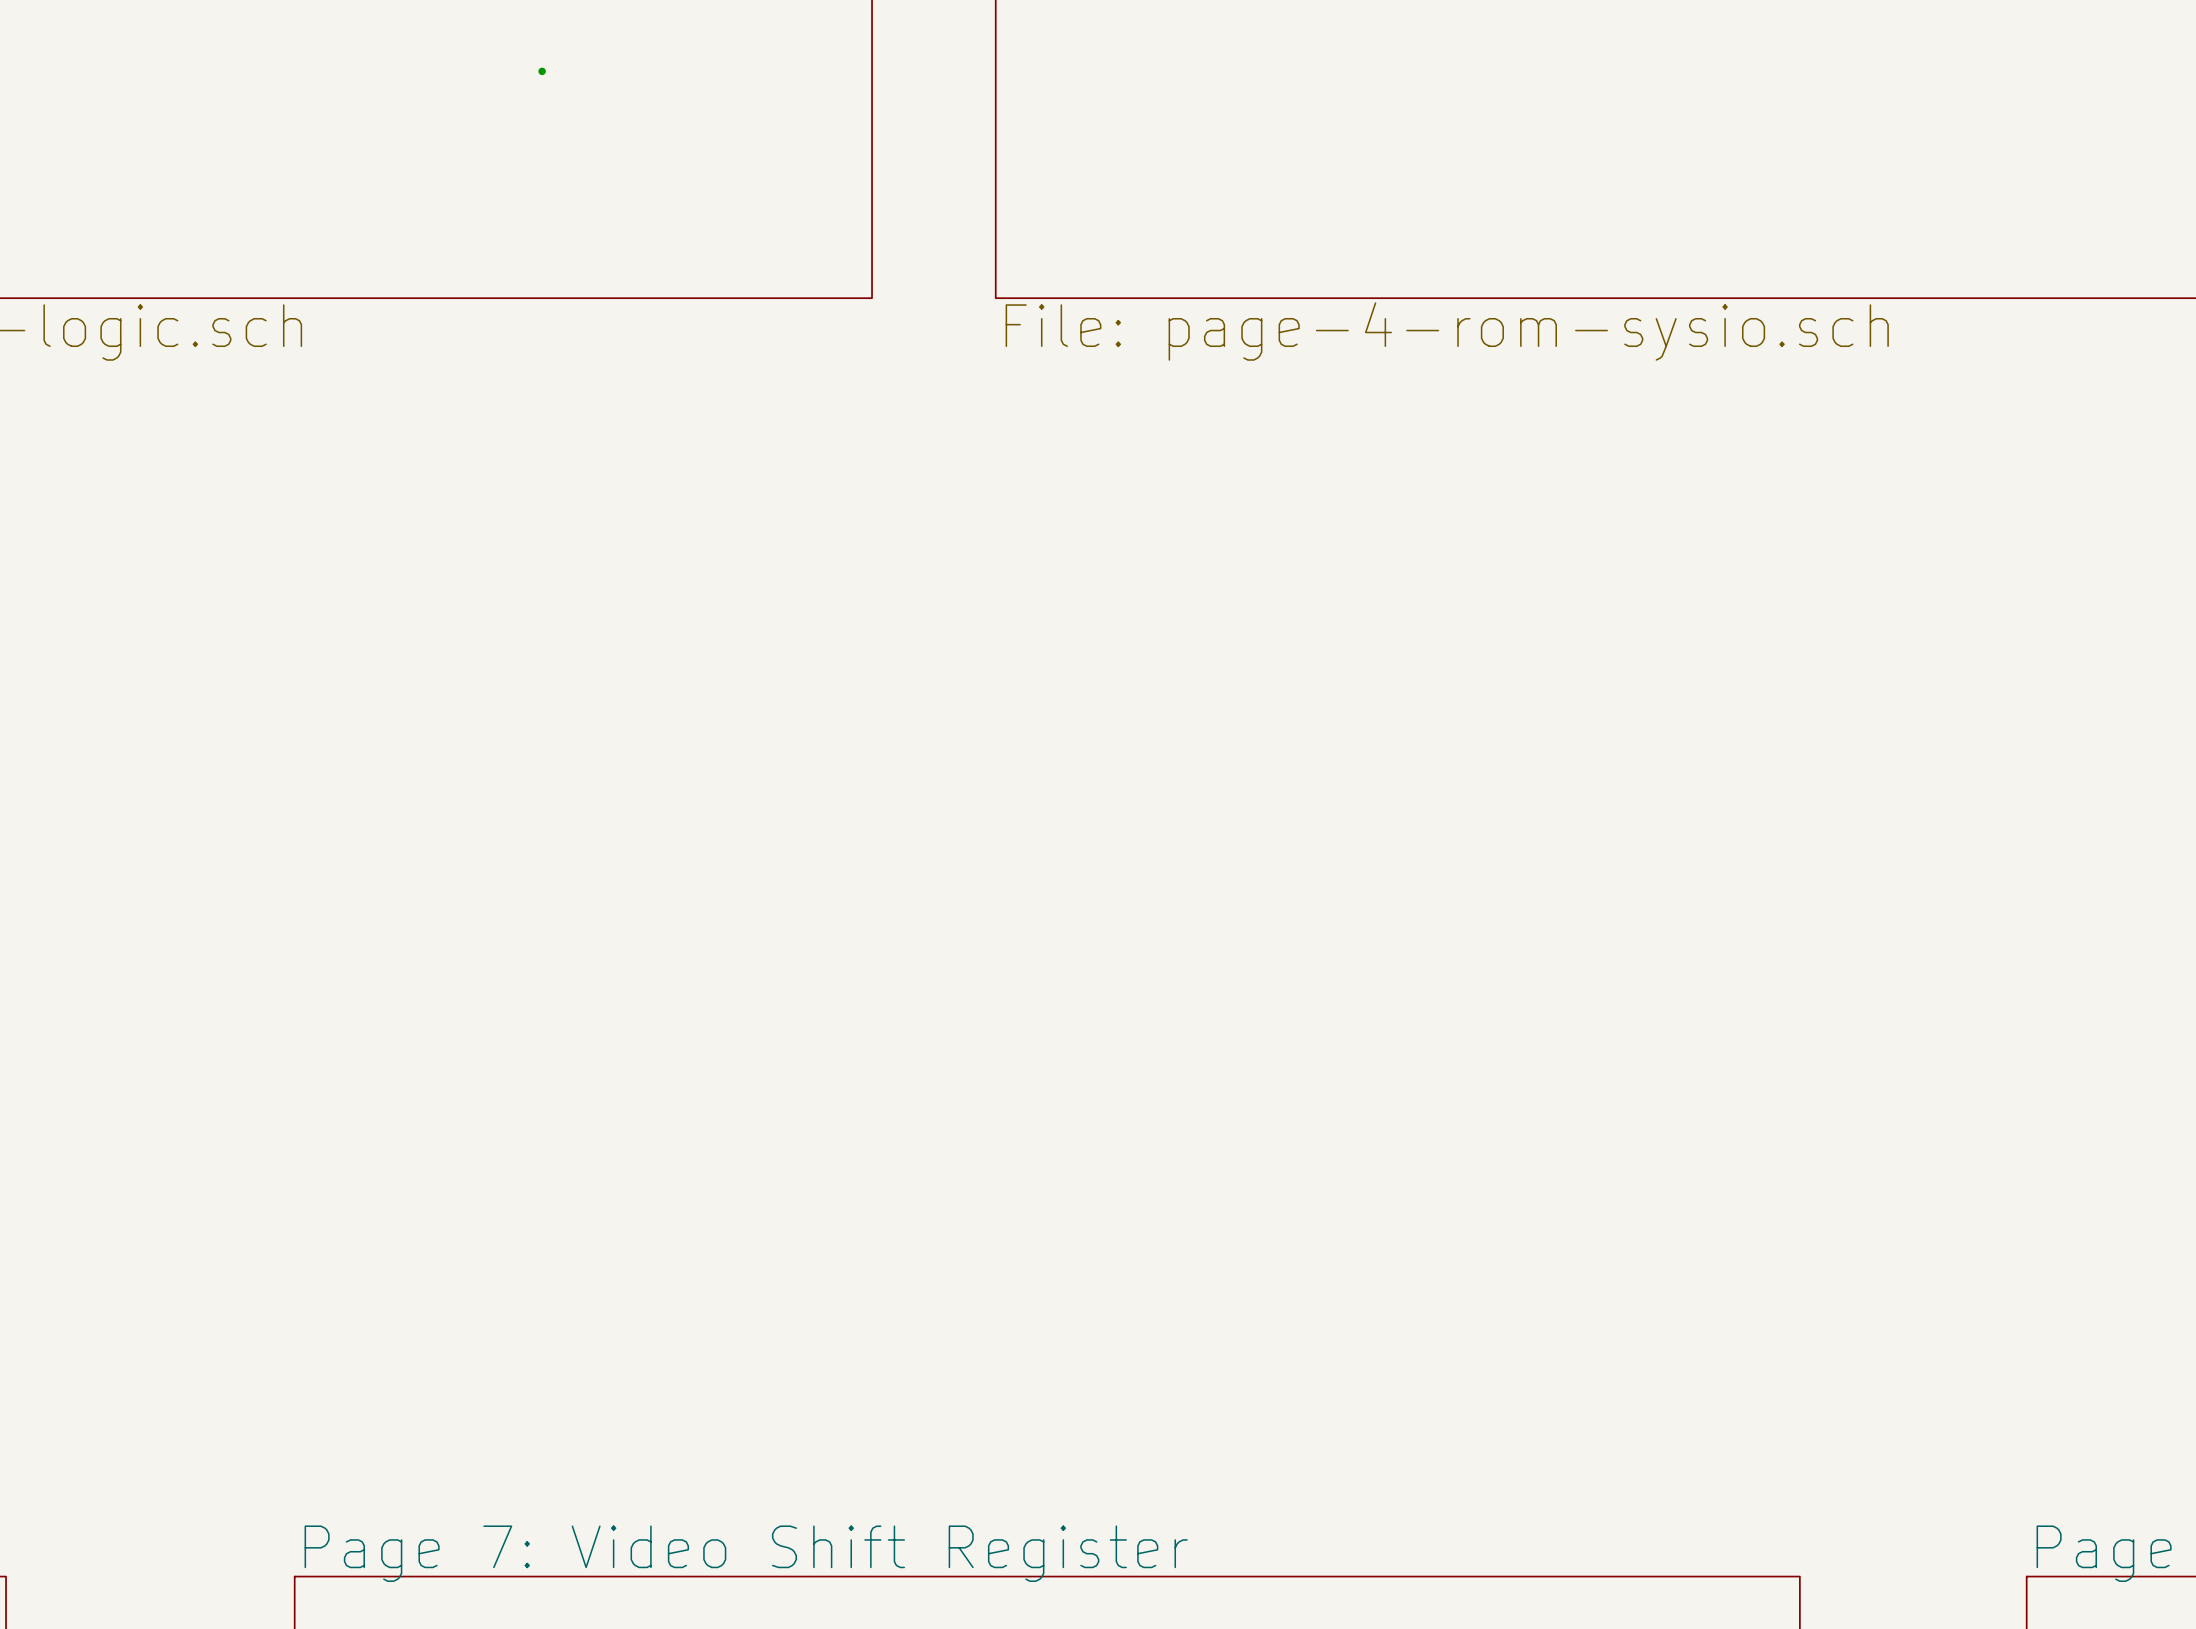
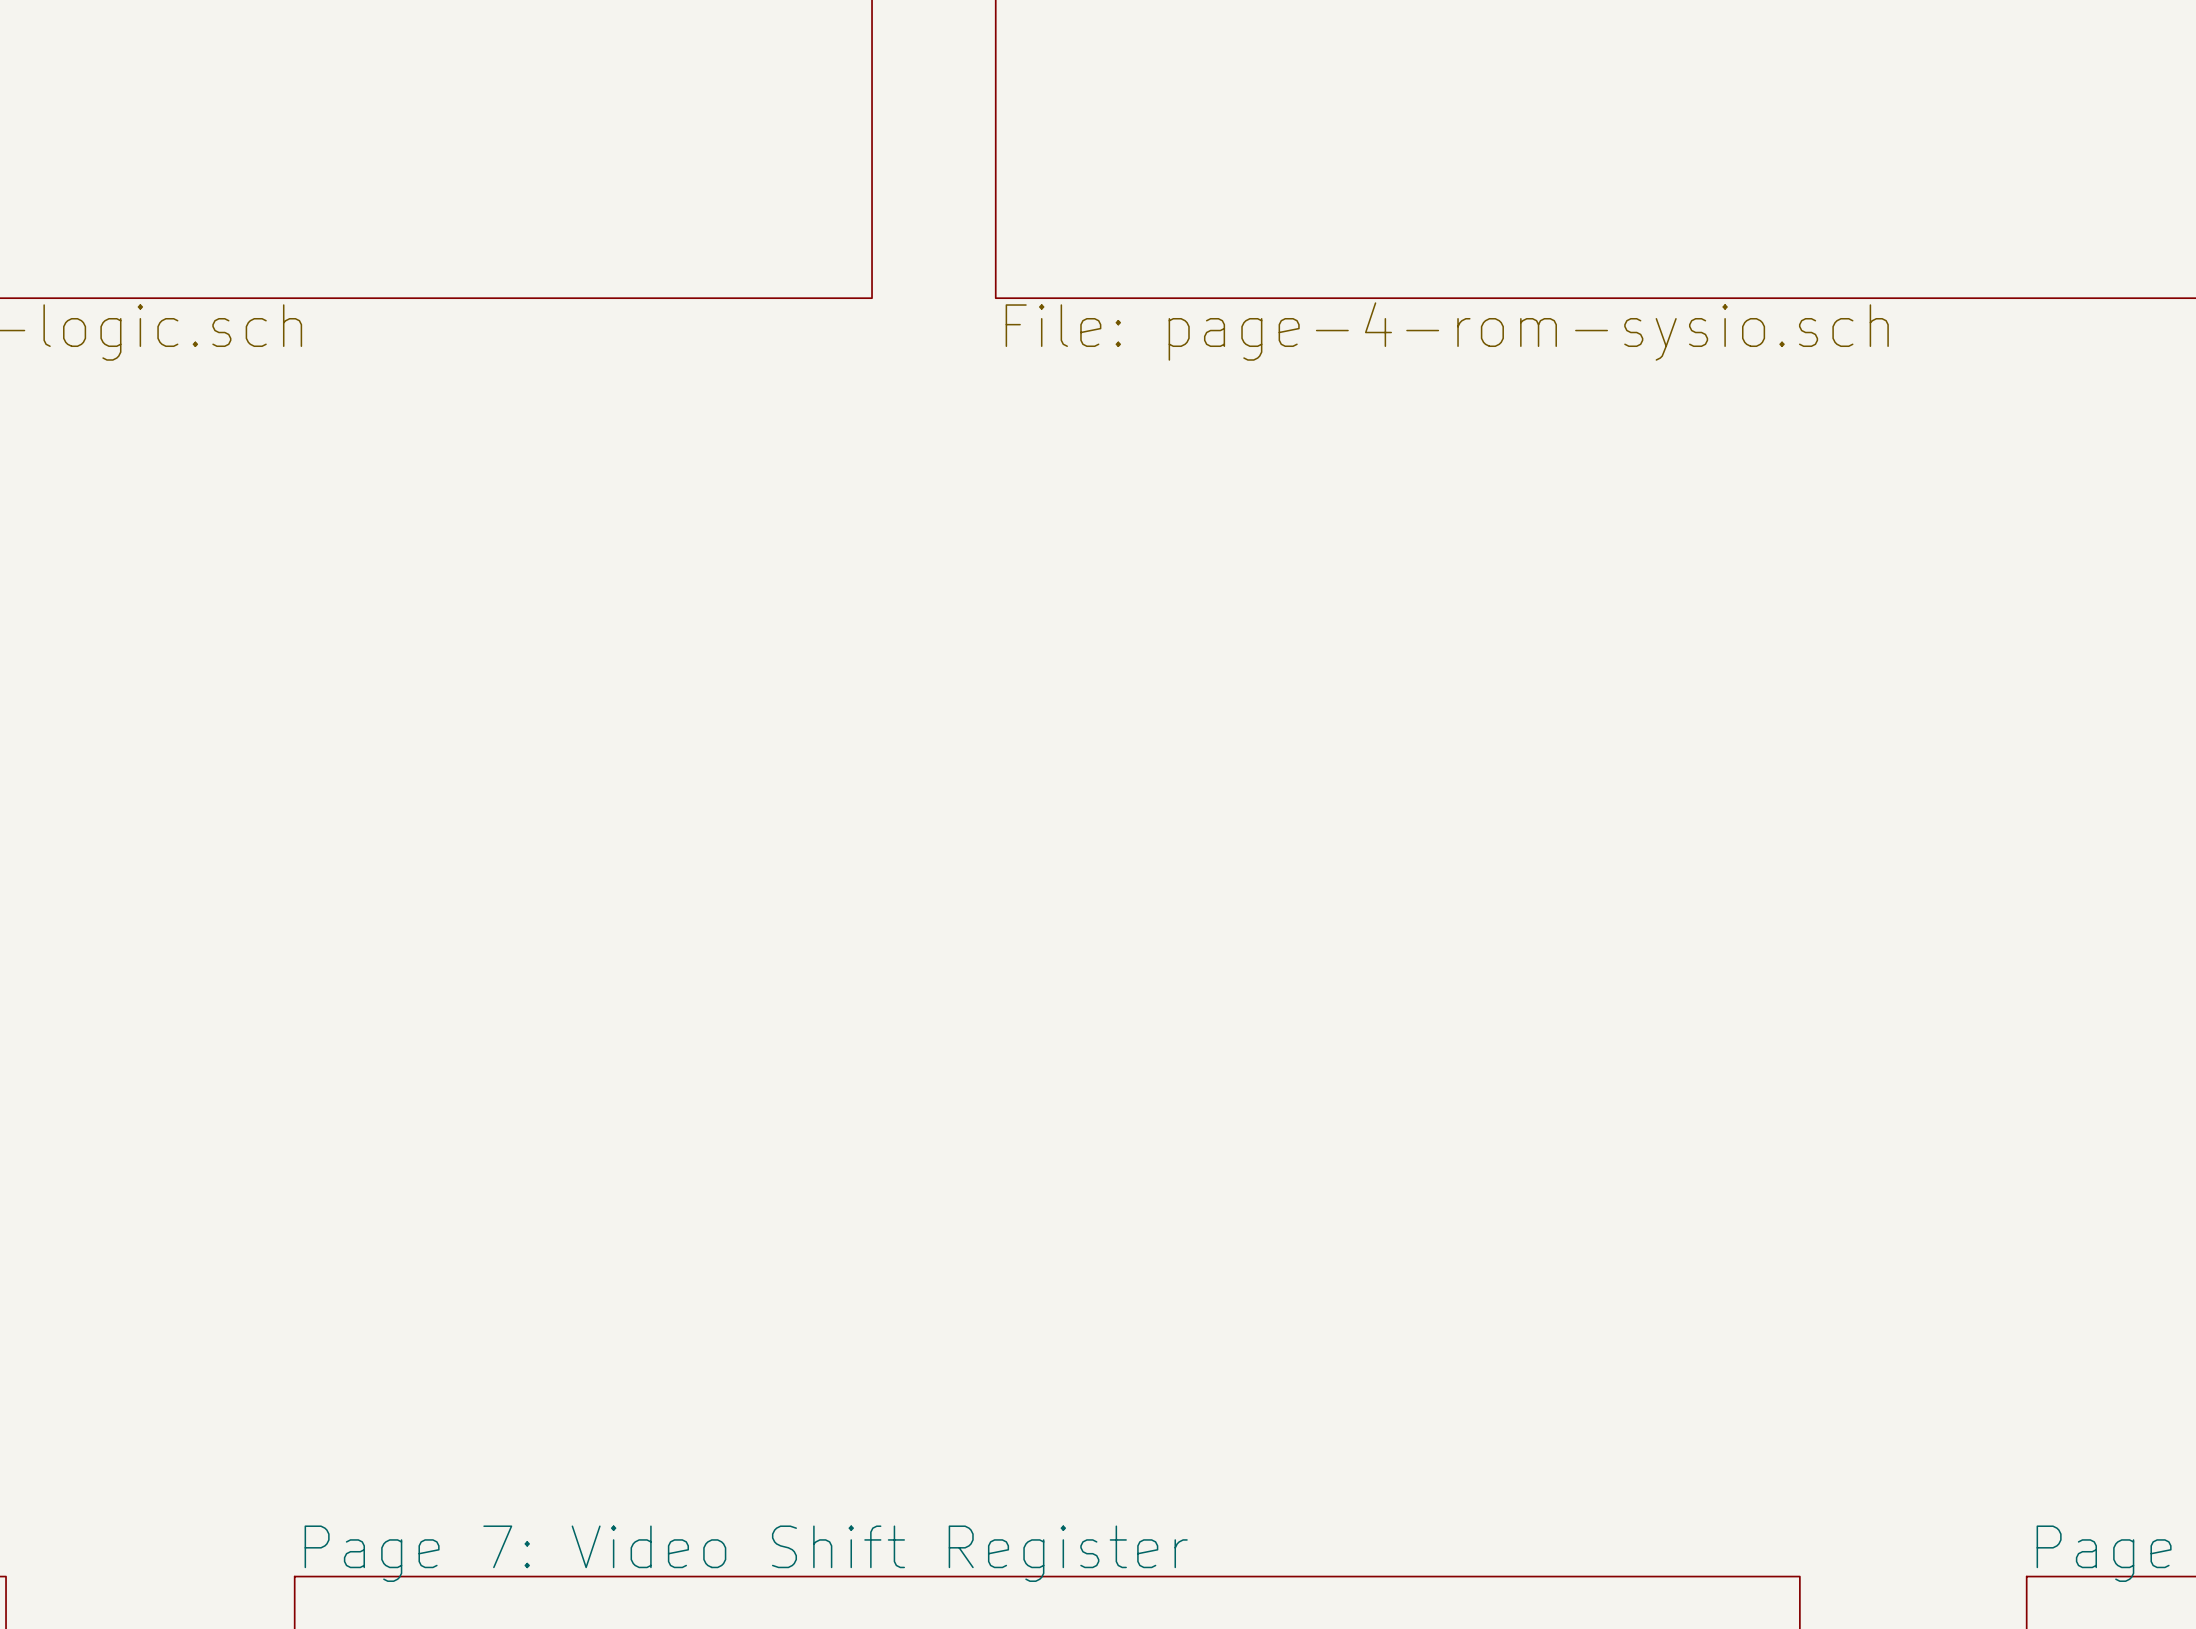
junction: (542, 71) -> none

